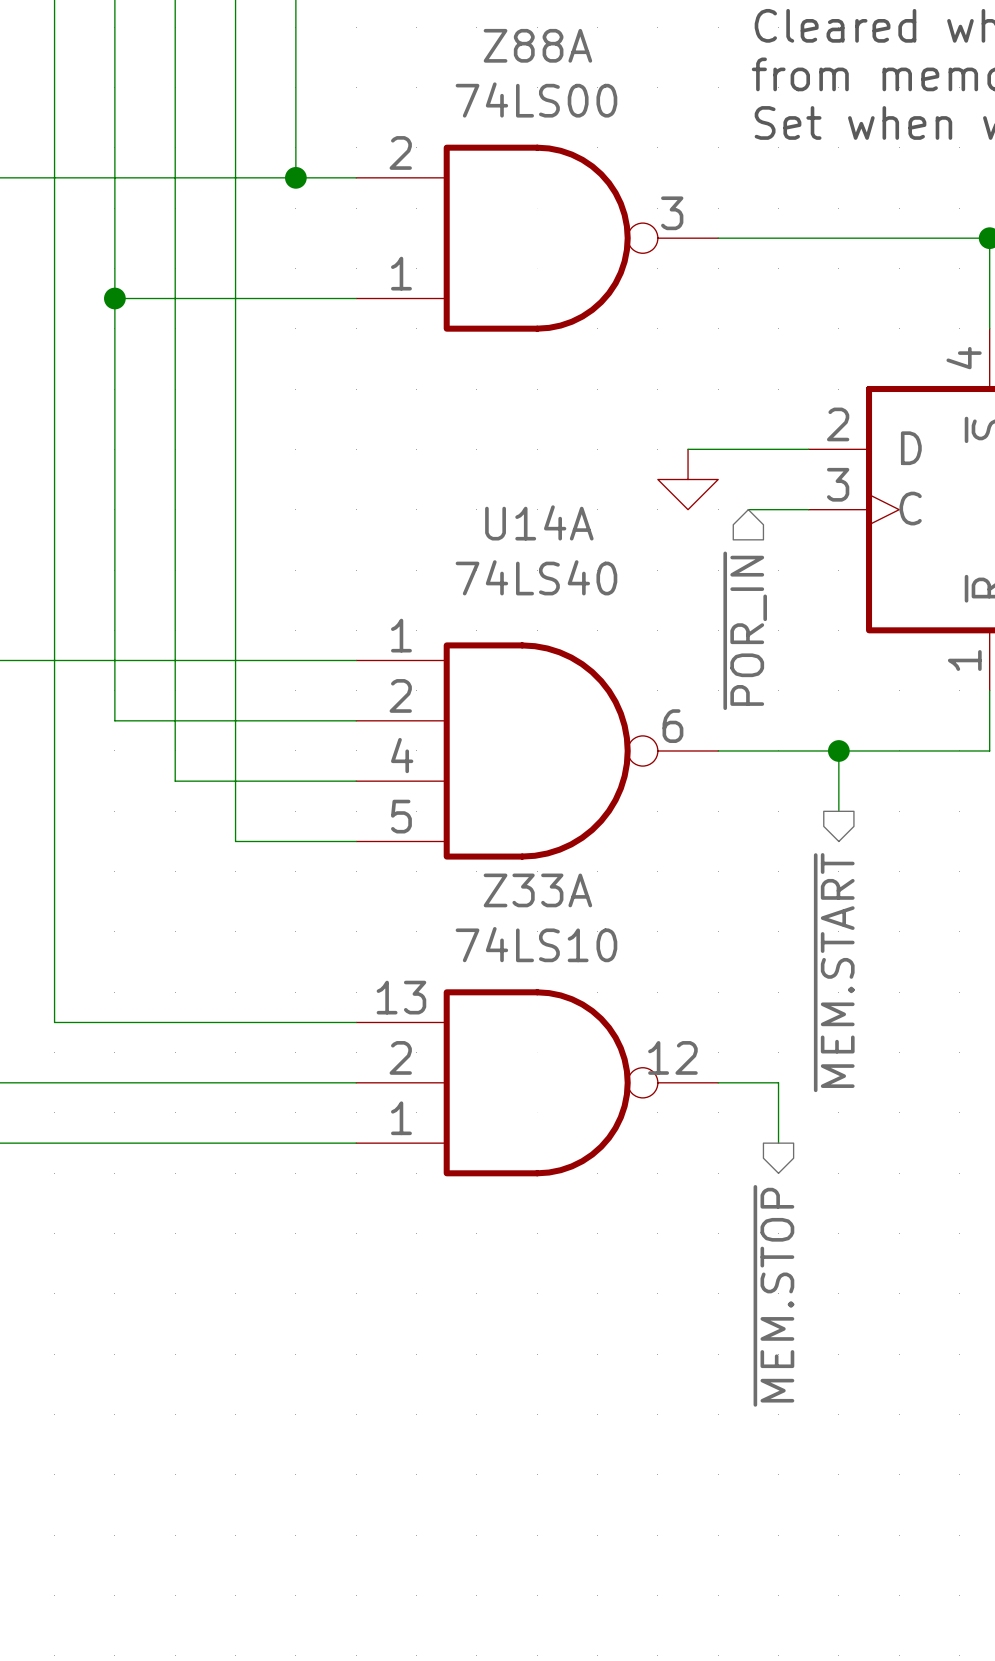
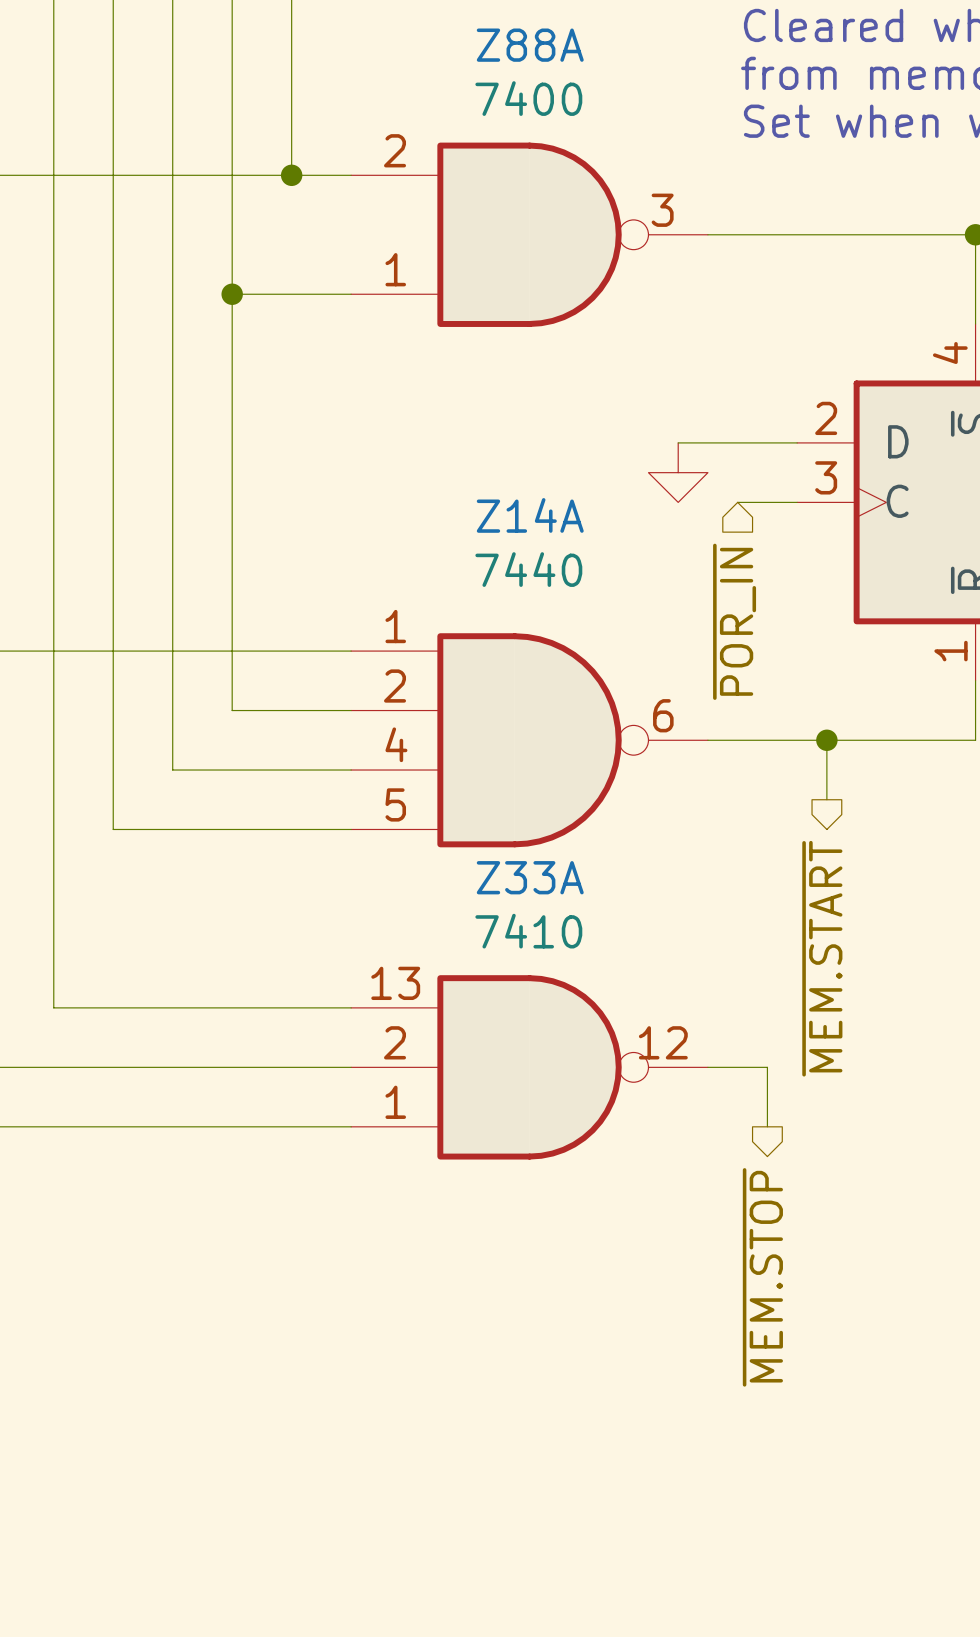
Z88A value: 74LS00 (536, 99) -> 7400 (528, 98)
wire: (114, 298) (235, 298) -> none
junction position: (114, 298) -> (232, 294)
U14A name: U14A (539, 522) -> Z14A (530, 515)
U14A value: 74LS40 (536, 577) -> 7440 (528, 569)
wire: (114, 720) (235, 720) (235, 841) -> (113, 710) (113, 829) (232, 829)
Z33A value: 74LS10 (536, 944) -> 7410 (528, 931)

